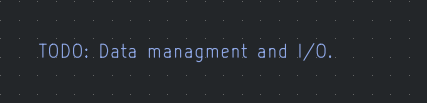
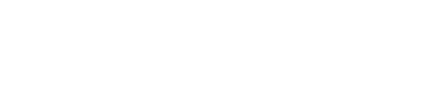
text: TODO: Data managment and I/O. (185, 52) -> none

